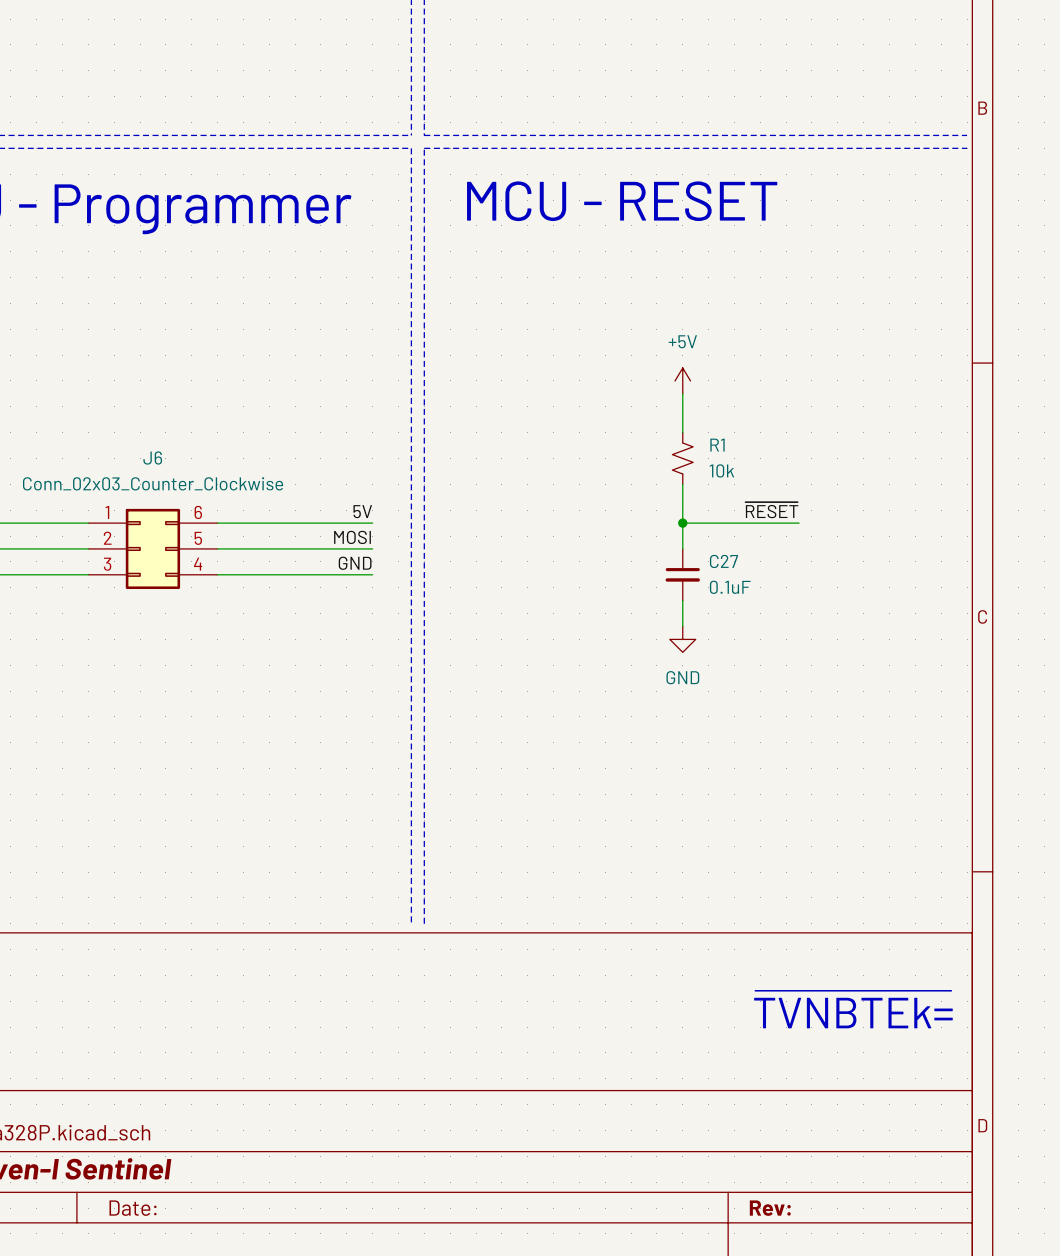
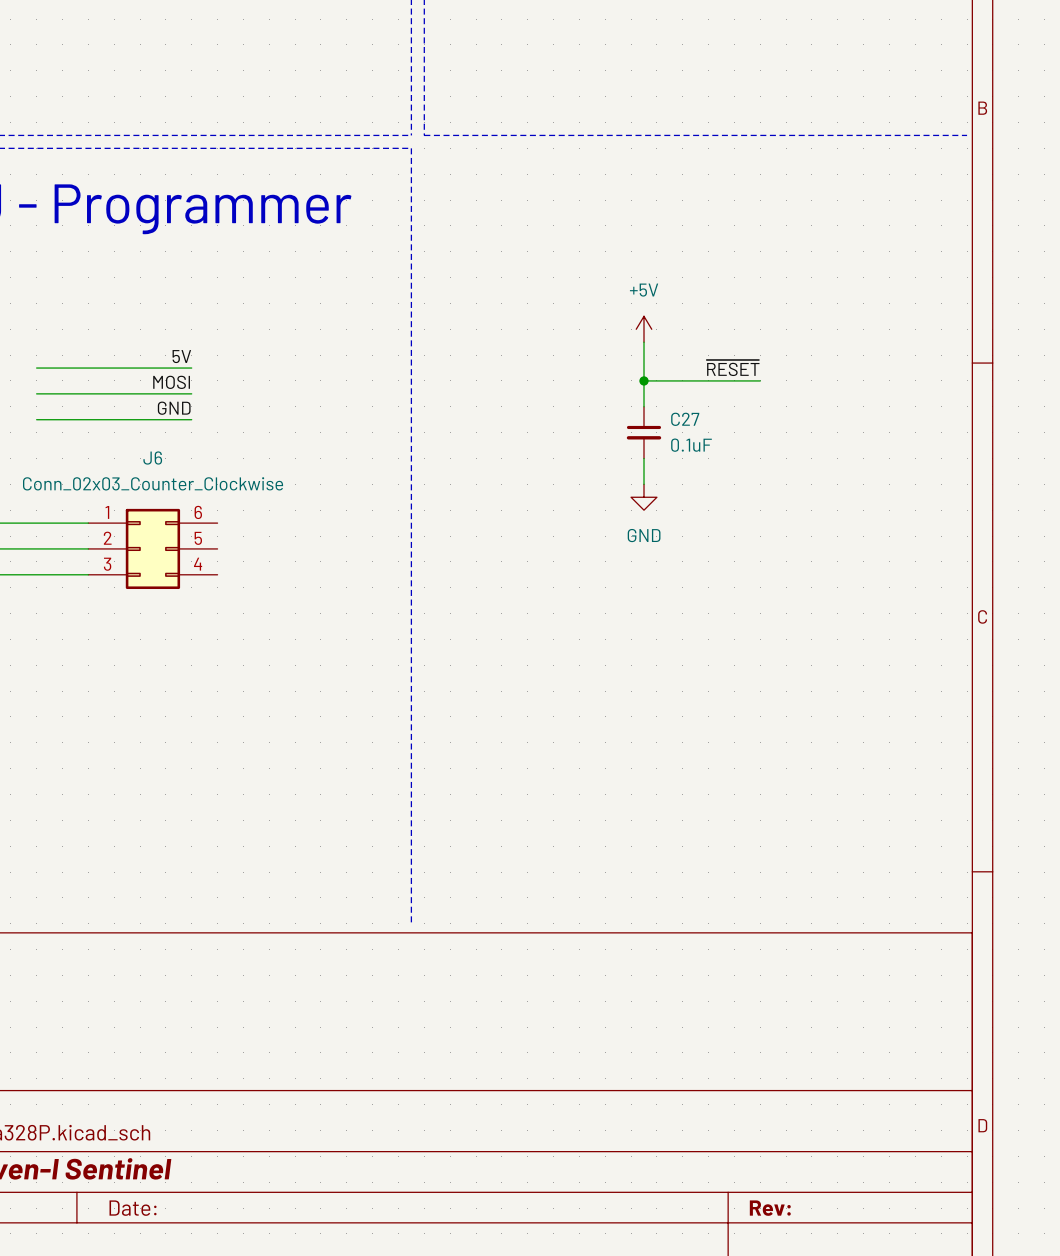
line: (967, 148) (424, 148) (424, 923) -> none
text: MCU - RESET (622, 201) -> none
junction: none -> (644, 380)
power symbol position: +5V (682, 380) -> +5V (644, 329)
wire: (682, 393) (682, 432) -> none
R1: 10k (682, 458) -> none
wire: (682, 484) (682, 548) -> (644, 342) (644, 406)
label position: ~{RESET} (771, 510) -> ~{RESET} (733, 368)
label position: 5V (362, 511) -> 5V (181, 356)
wire: (217, 523) (372, 523) -> (36, 368) (191, 368)
wire: (682, 523) (799, 523) -> (644, 380) (760, 380)
junction: (682, 523) -> none
label position: MOSI (352, 537) -> MOSI (171, 382)
wire: (217, 548) (372, 548) -> (36, 393) (191, 393)
label position: GND (355, 563) -> GND (174, 408)
wire: (217, 574) (372, 574) -> (36, 419) (191, 419)
C27 position: (682, 574) -> (644, 432)
wire: (682, 600) (682, 626) -> (644, 458) (644, 484)
power symbol position: GND (682, 639) -> GND (644, 497)
text: ~{TVNBTEk=} (853, 1009) -> none

